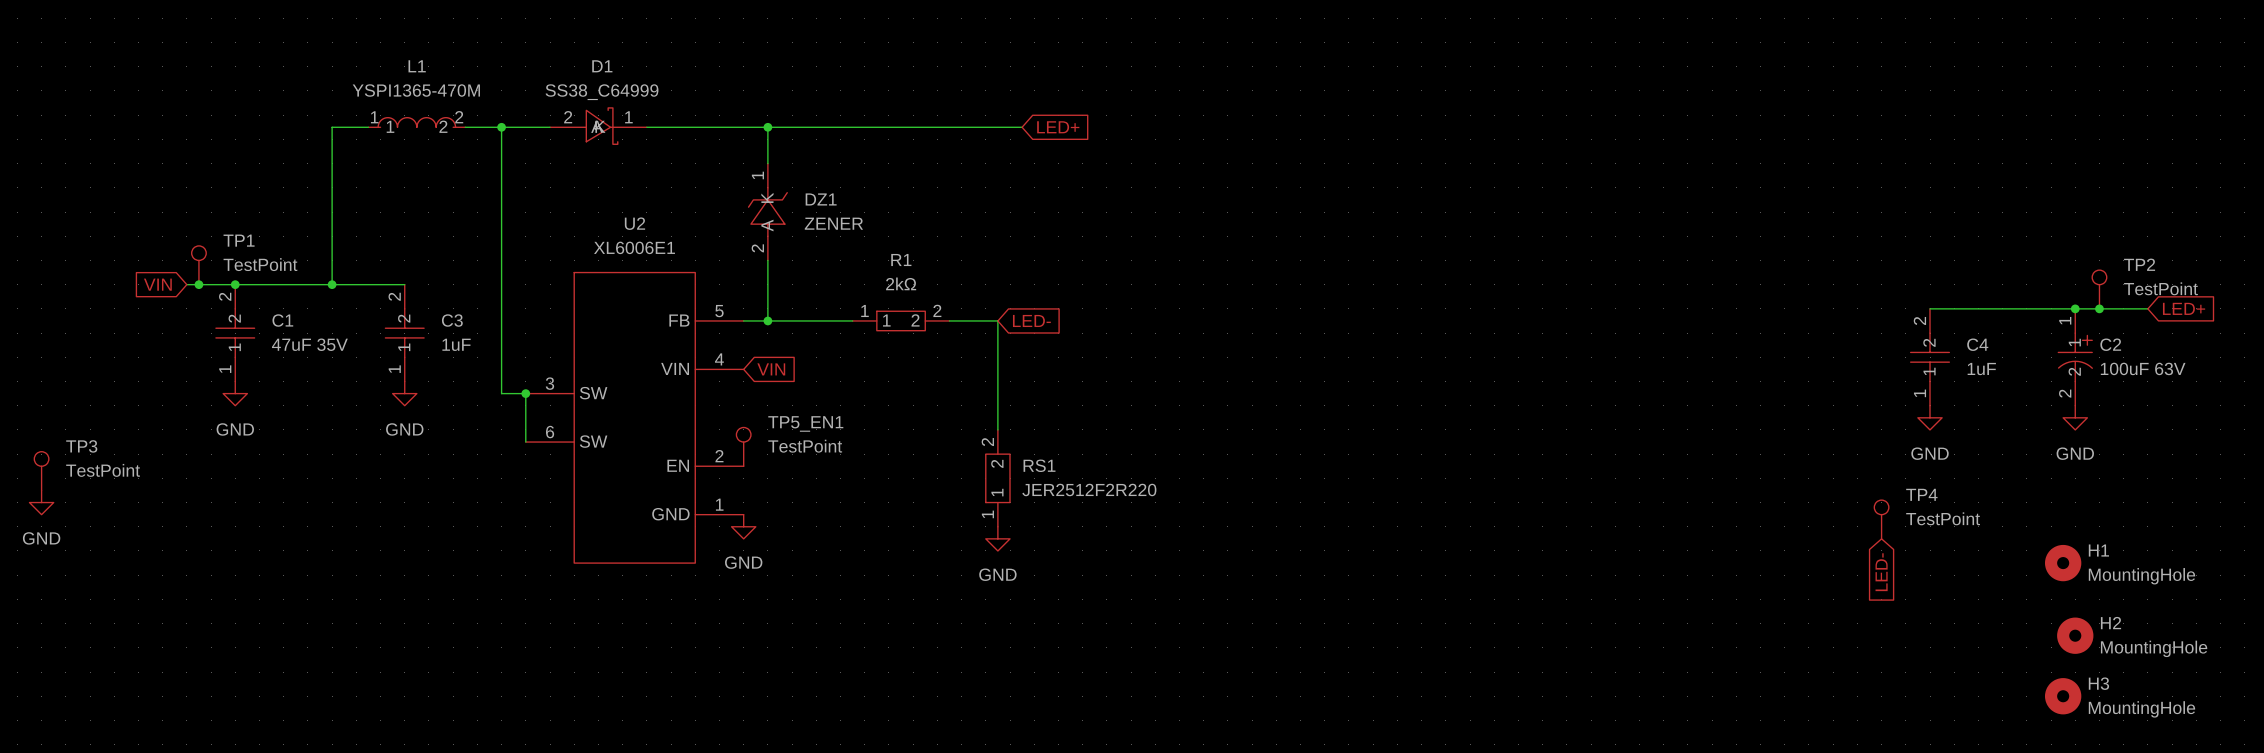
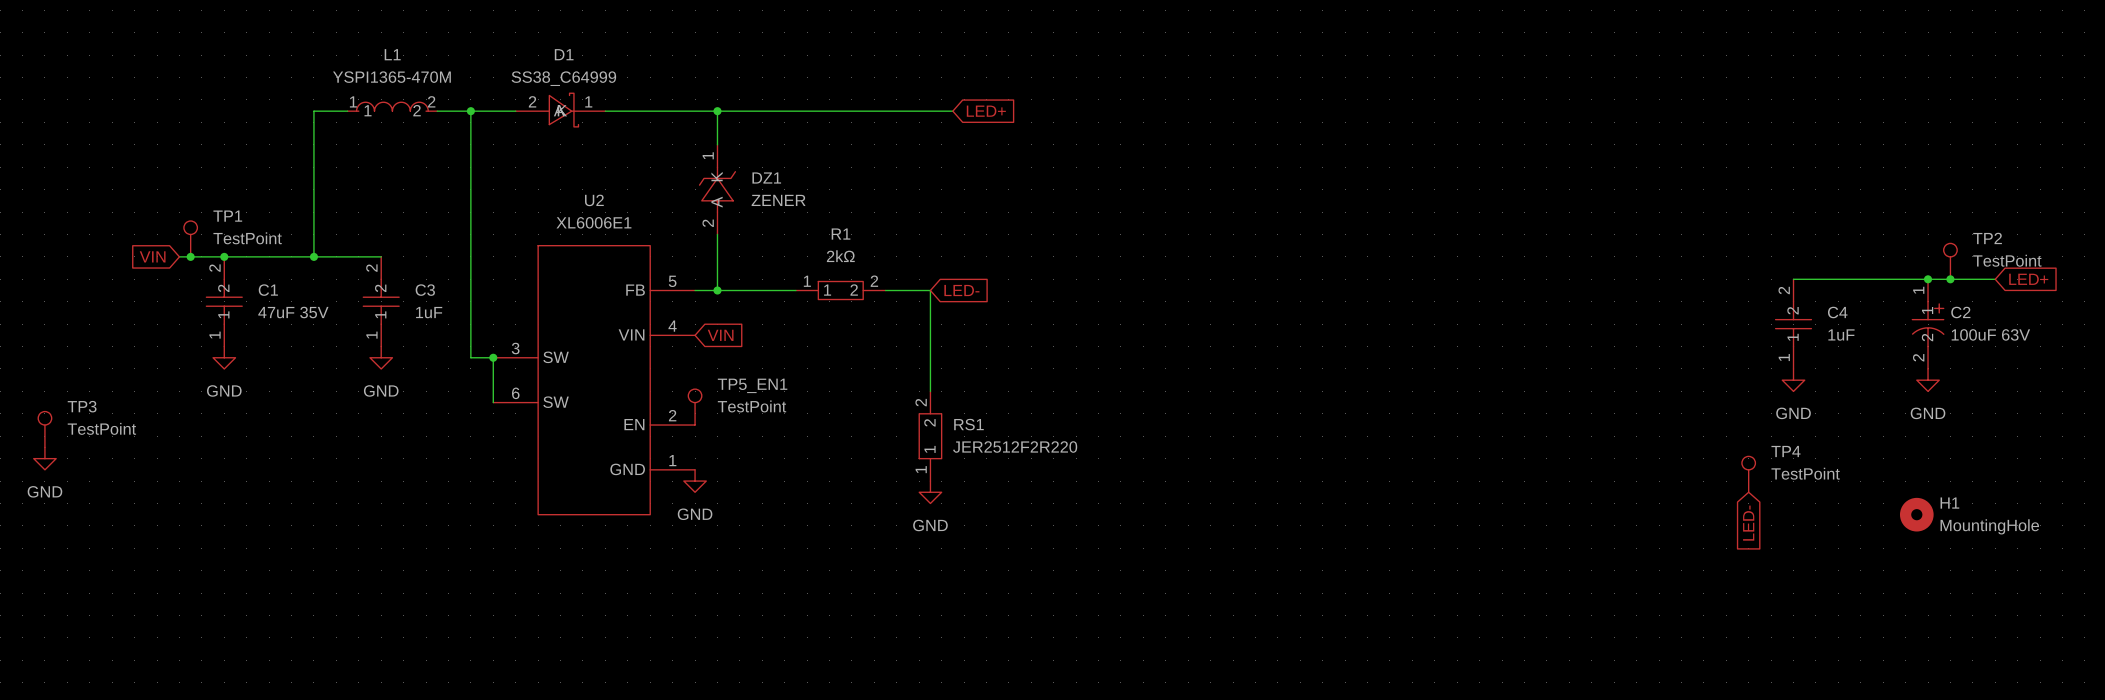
H2: MountingHole (2075, 635) -> none
H3: MountingHole (2063, 696) -> none

